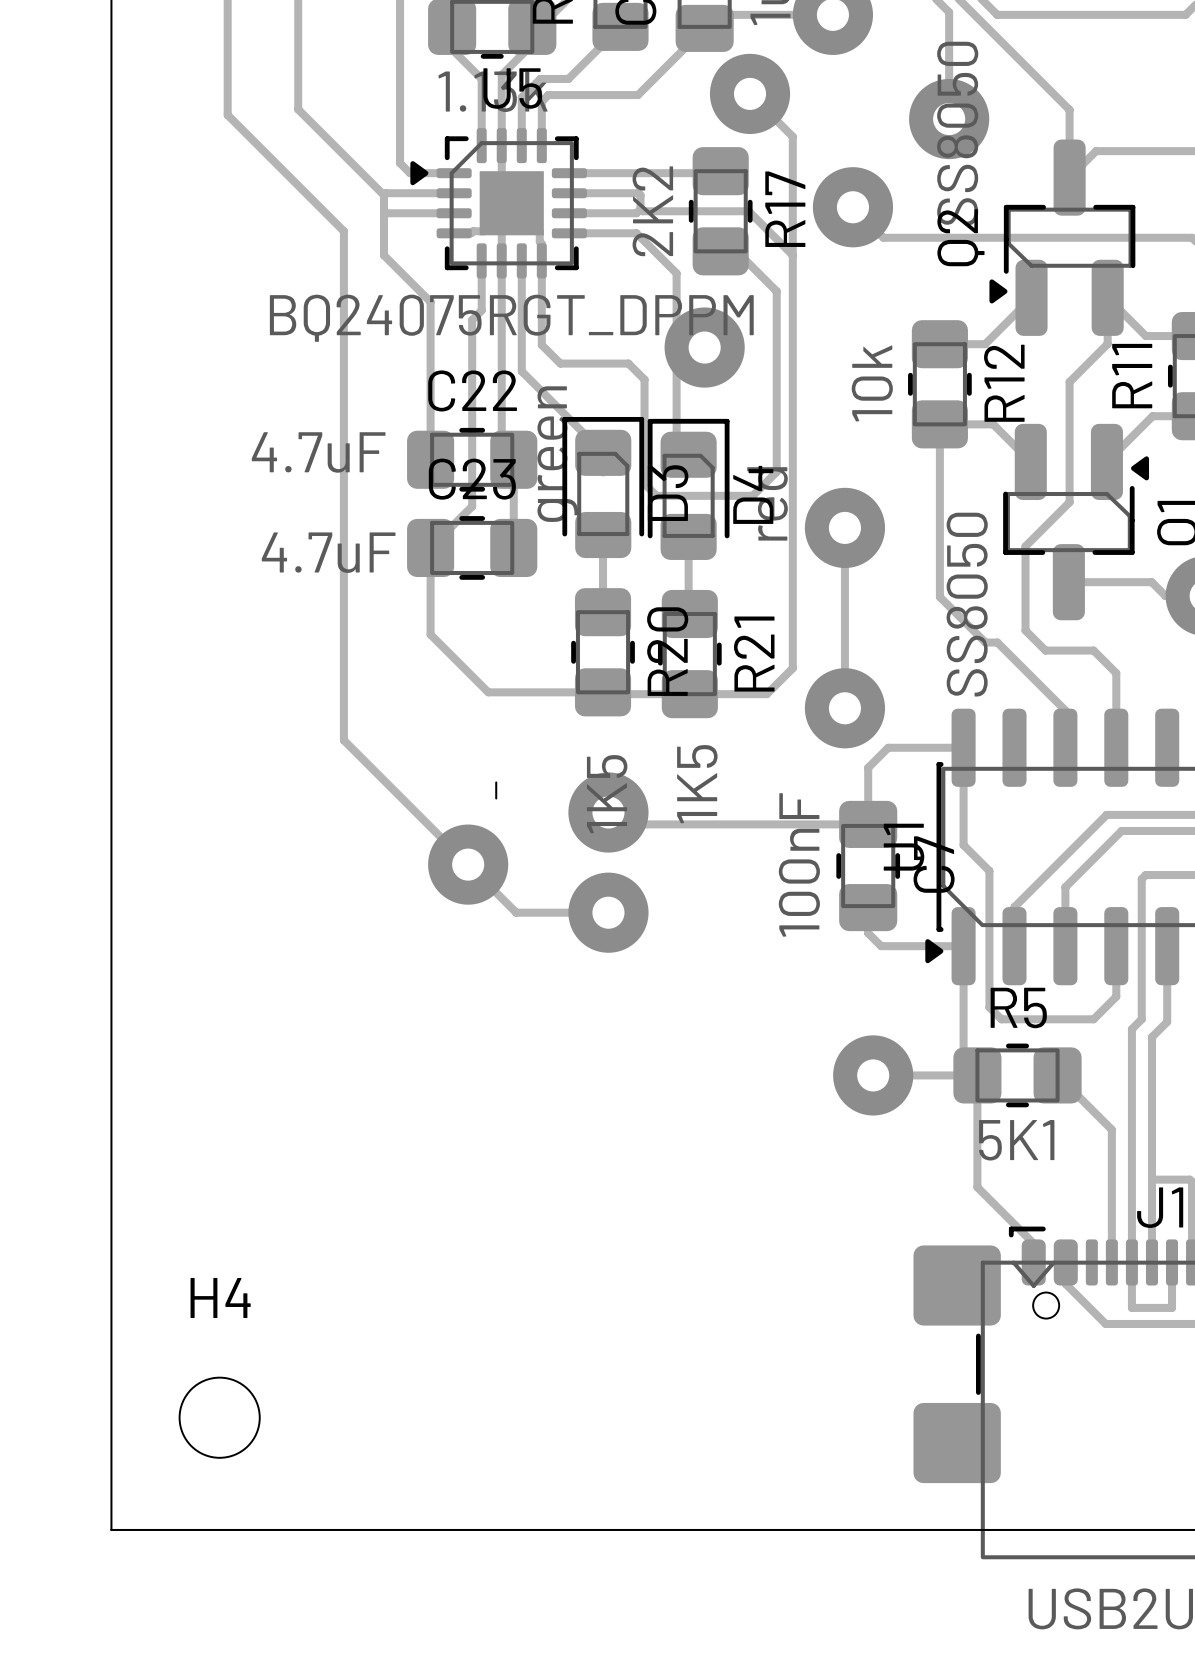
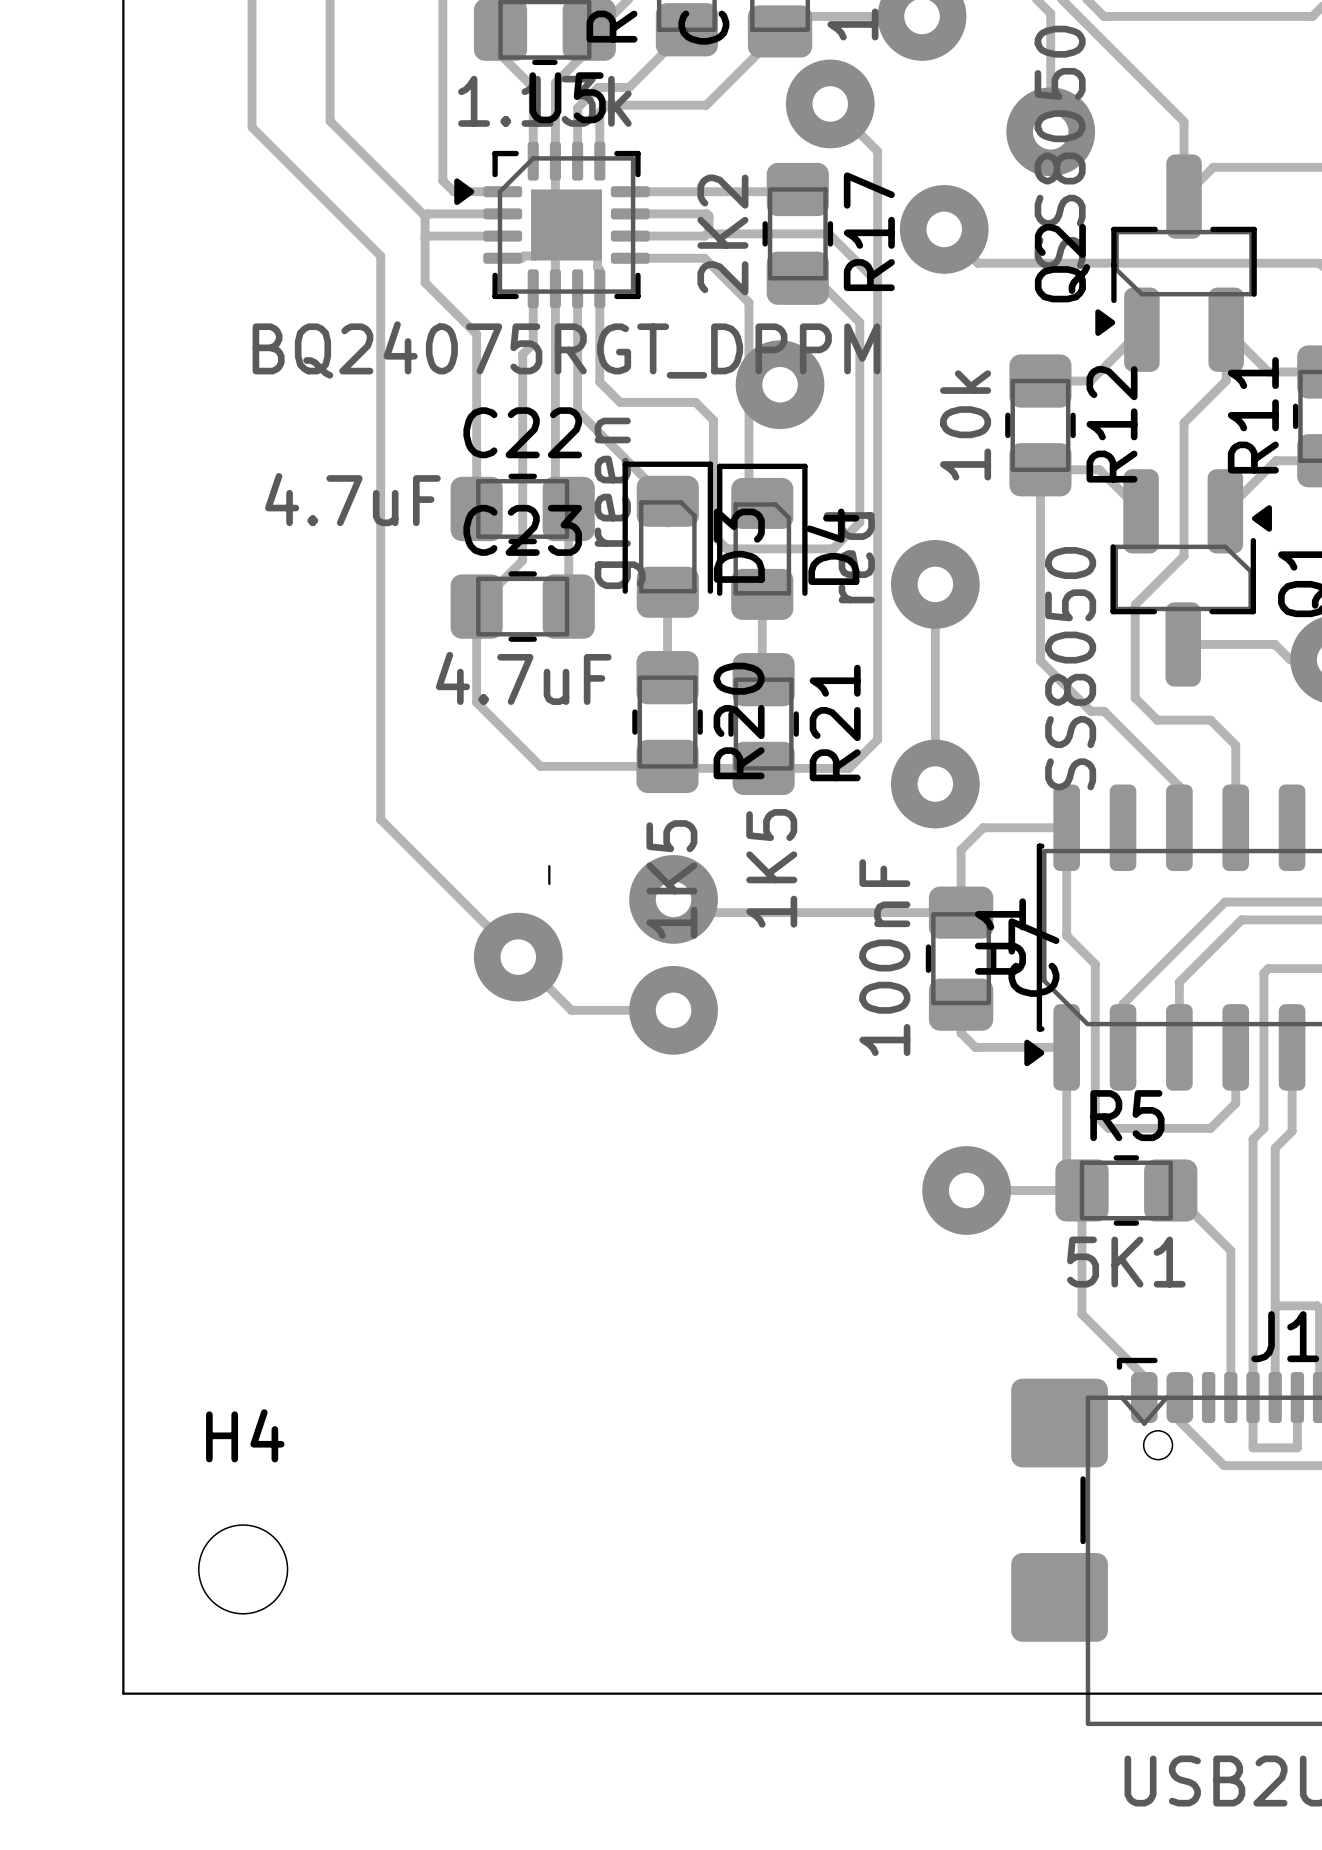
C23 value position: 4.7uF (328, 552) -> 4.7uF (523, 678)

